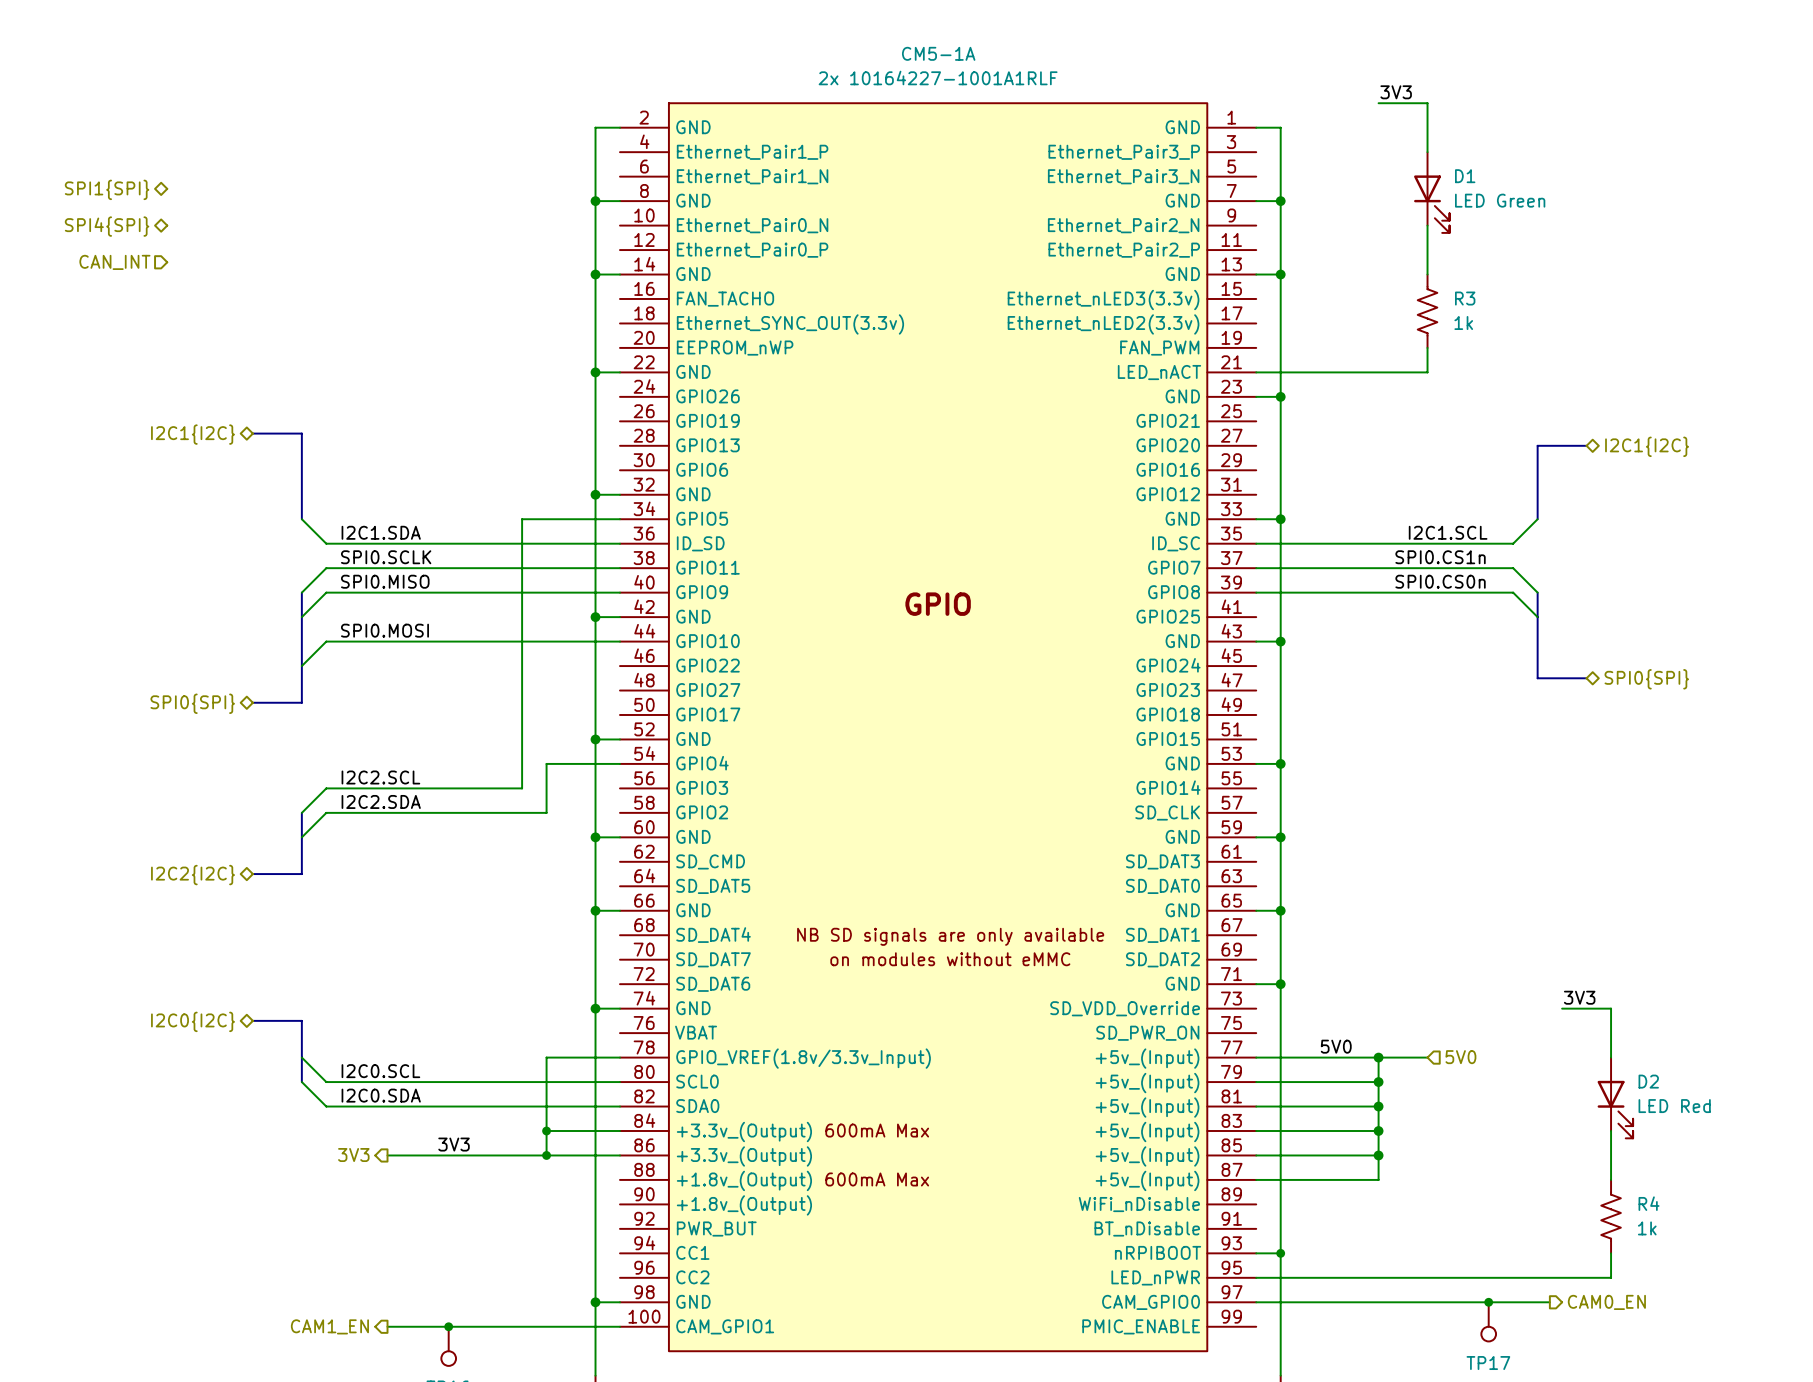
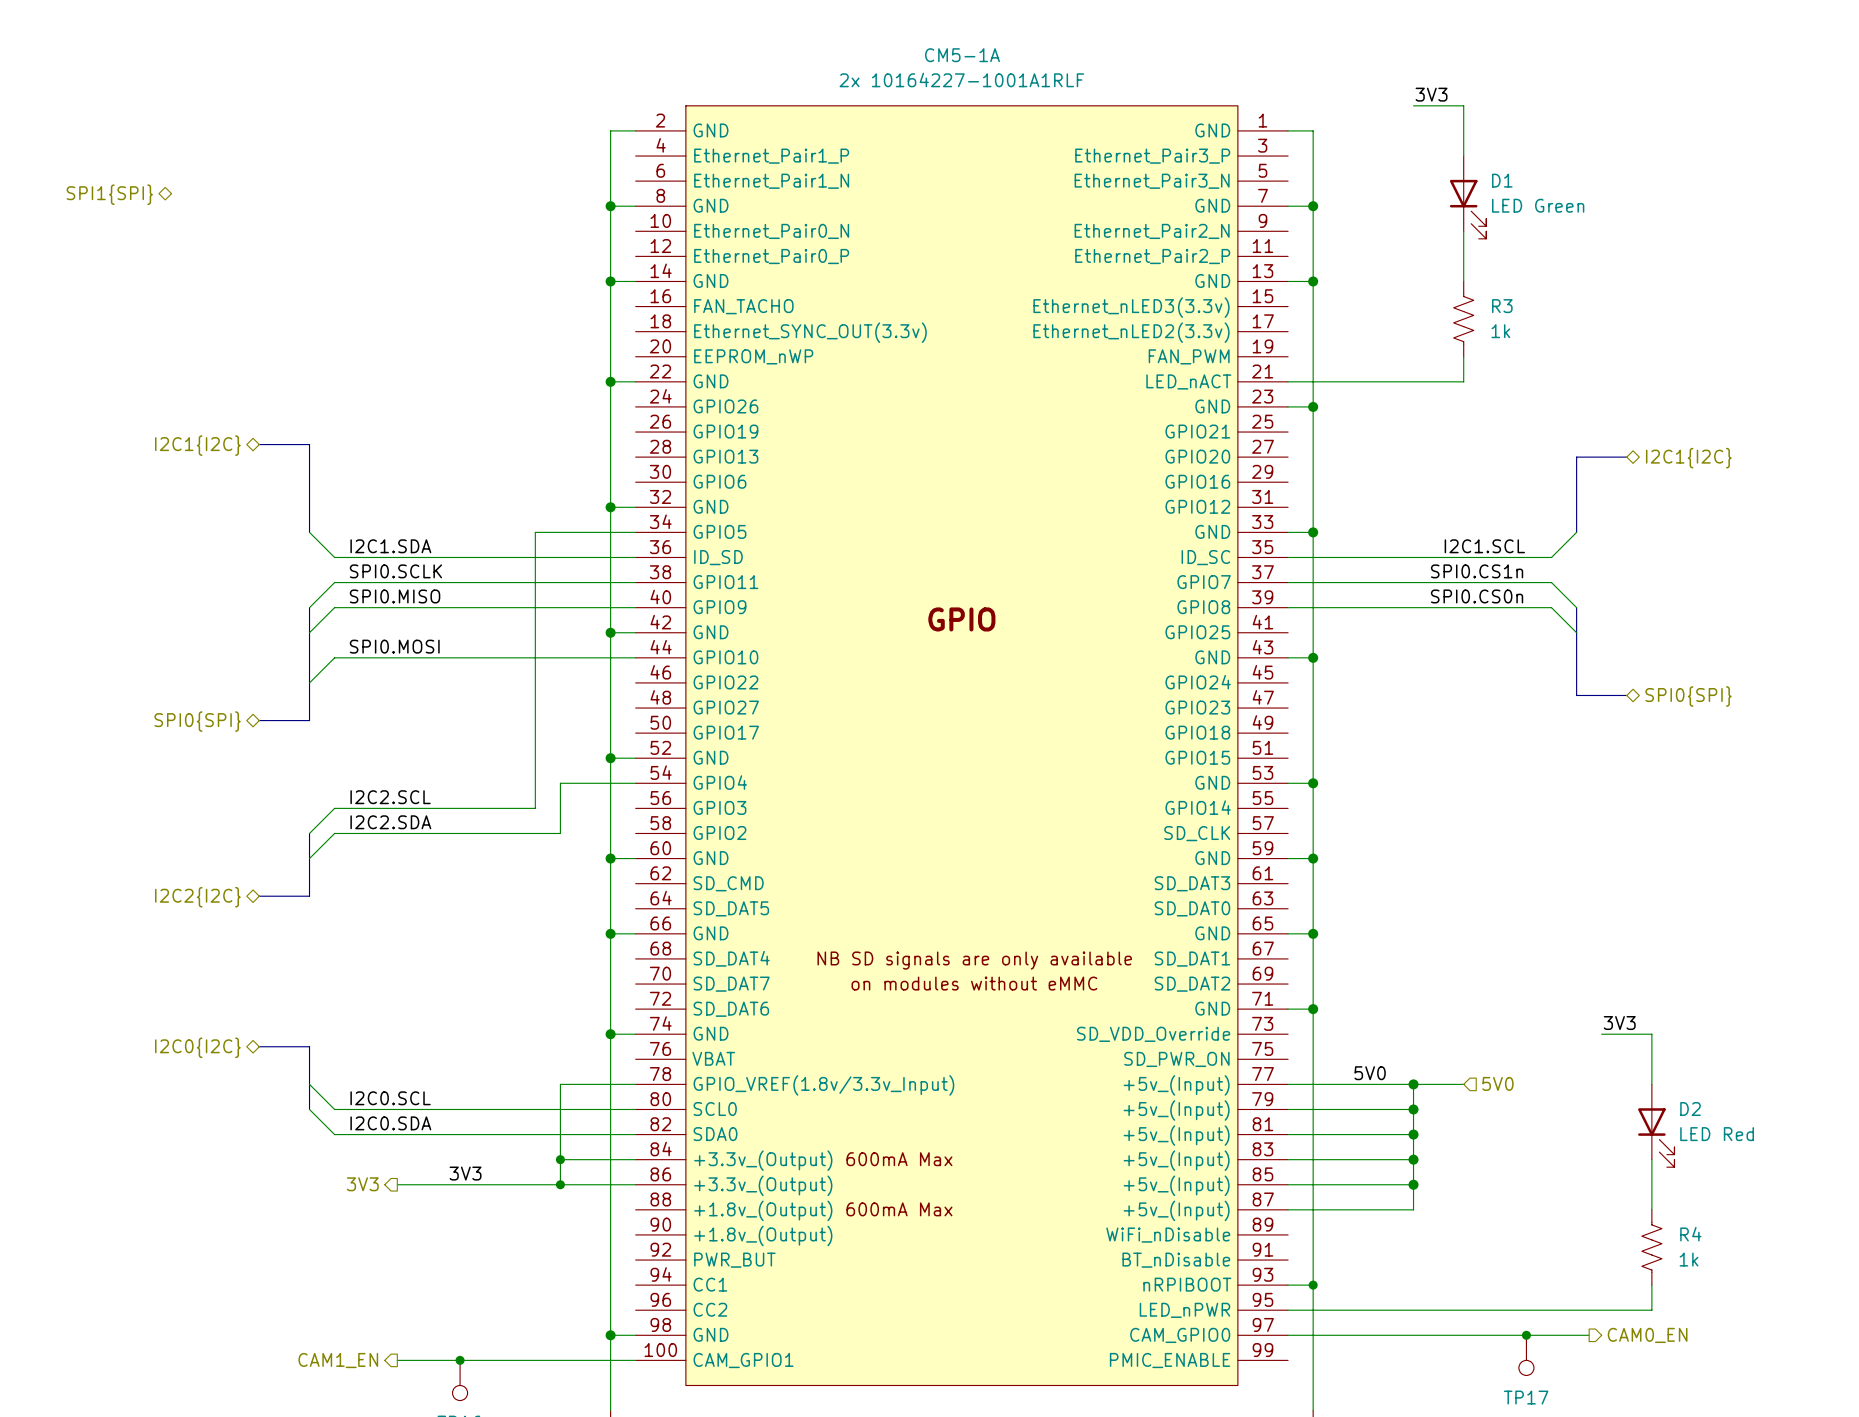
hierarchical label: SPI4{SPI} (107, 226) -> none
hierarchical label: CAN_INT (114, 262) -> none

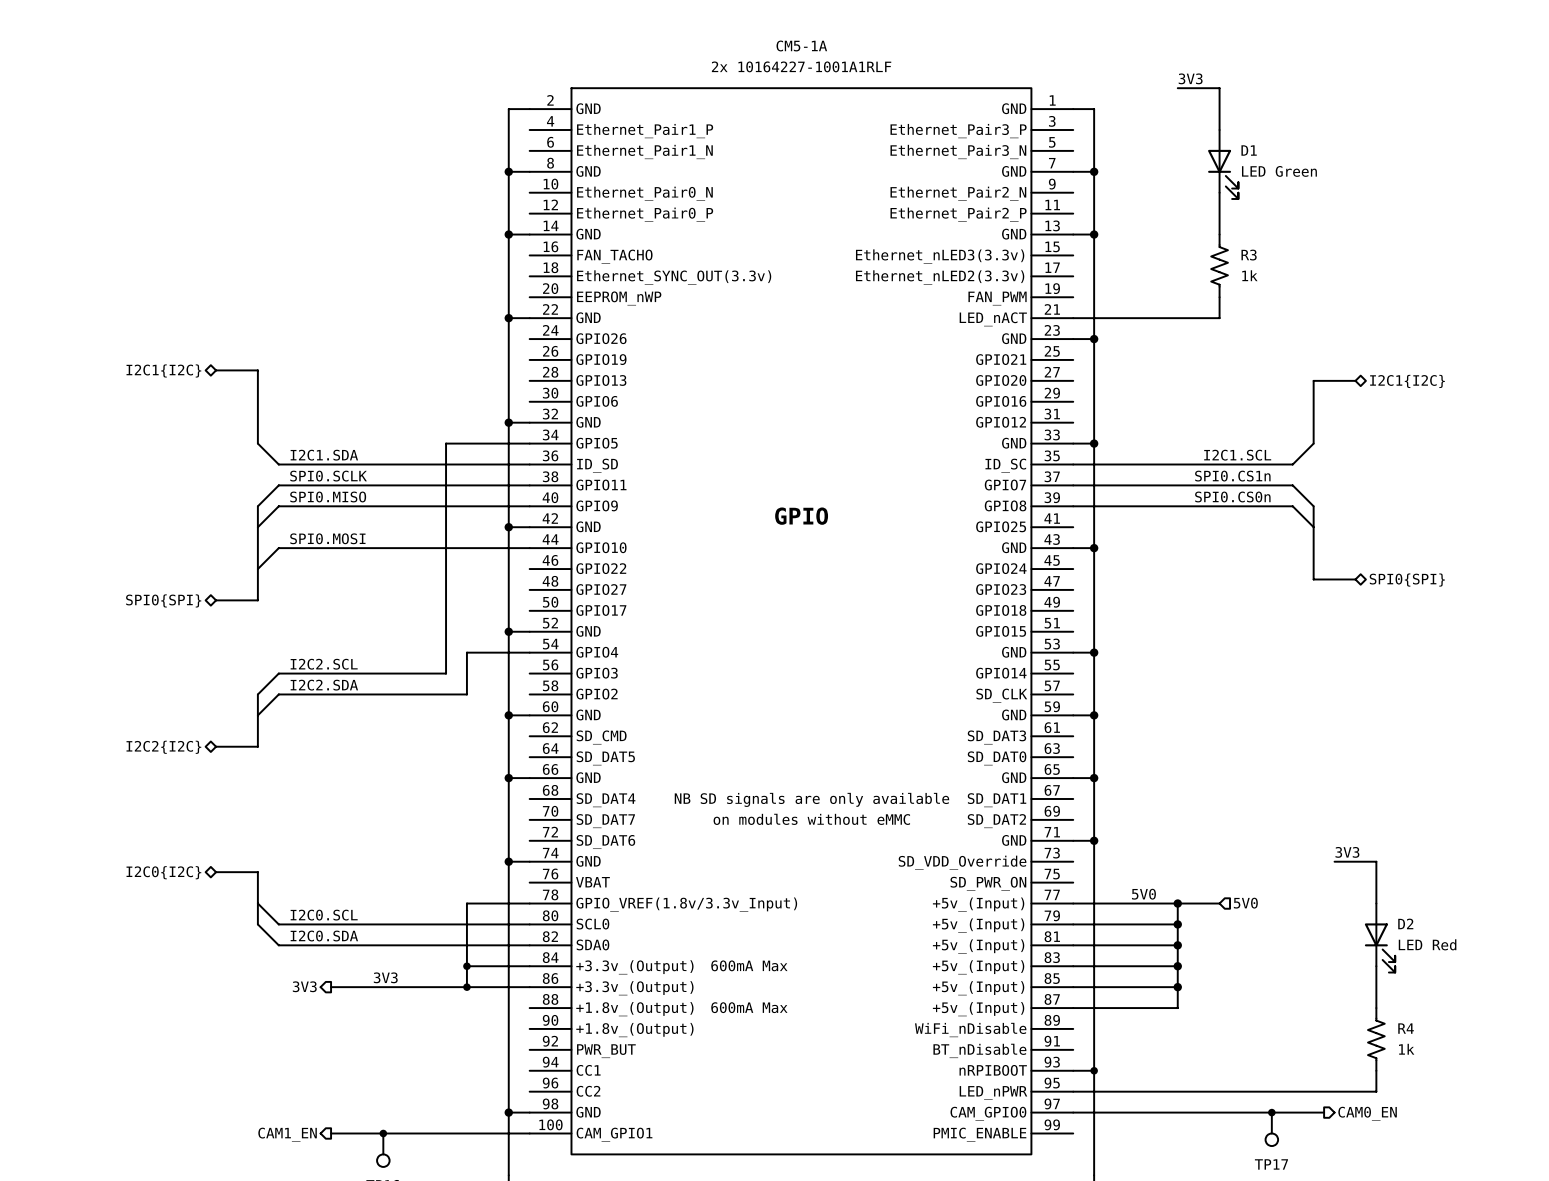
hierarchical label: SPI1{SPI} (109, 194) -> none

